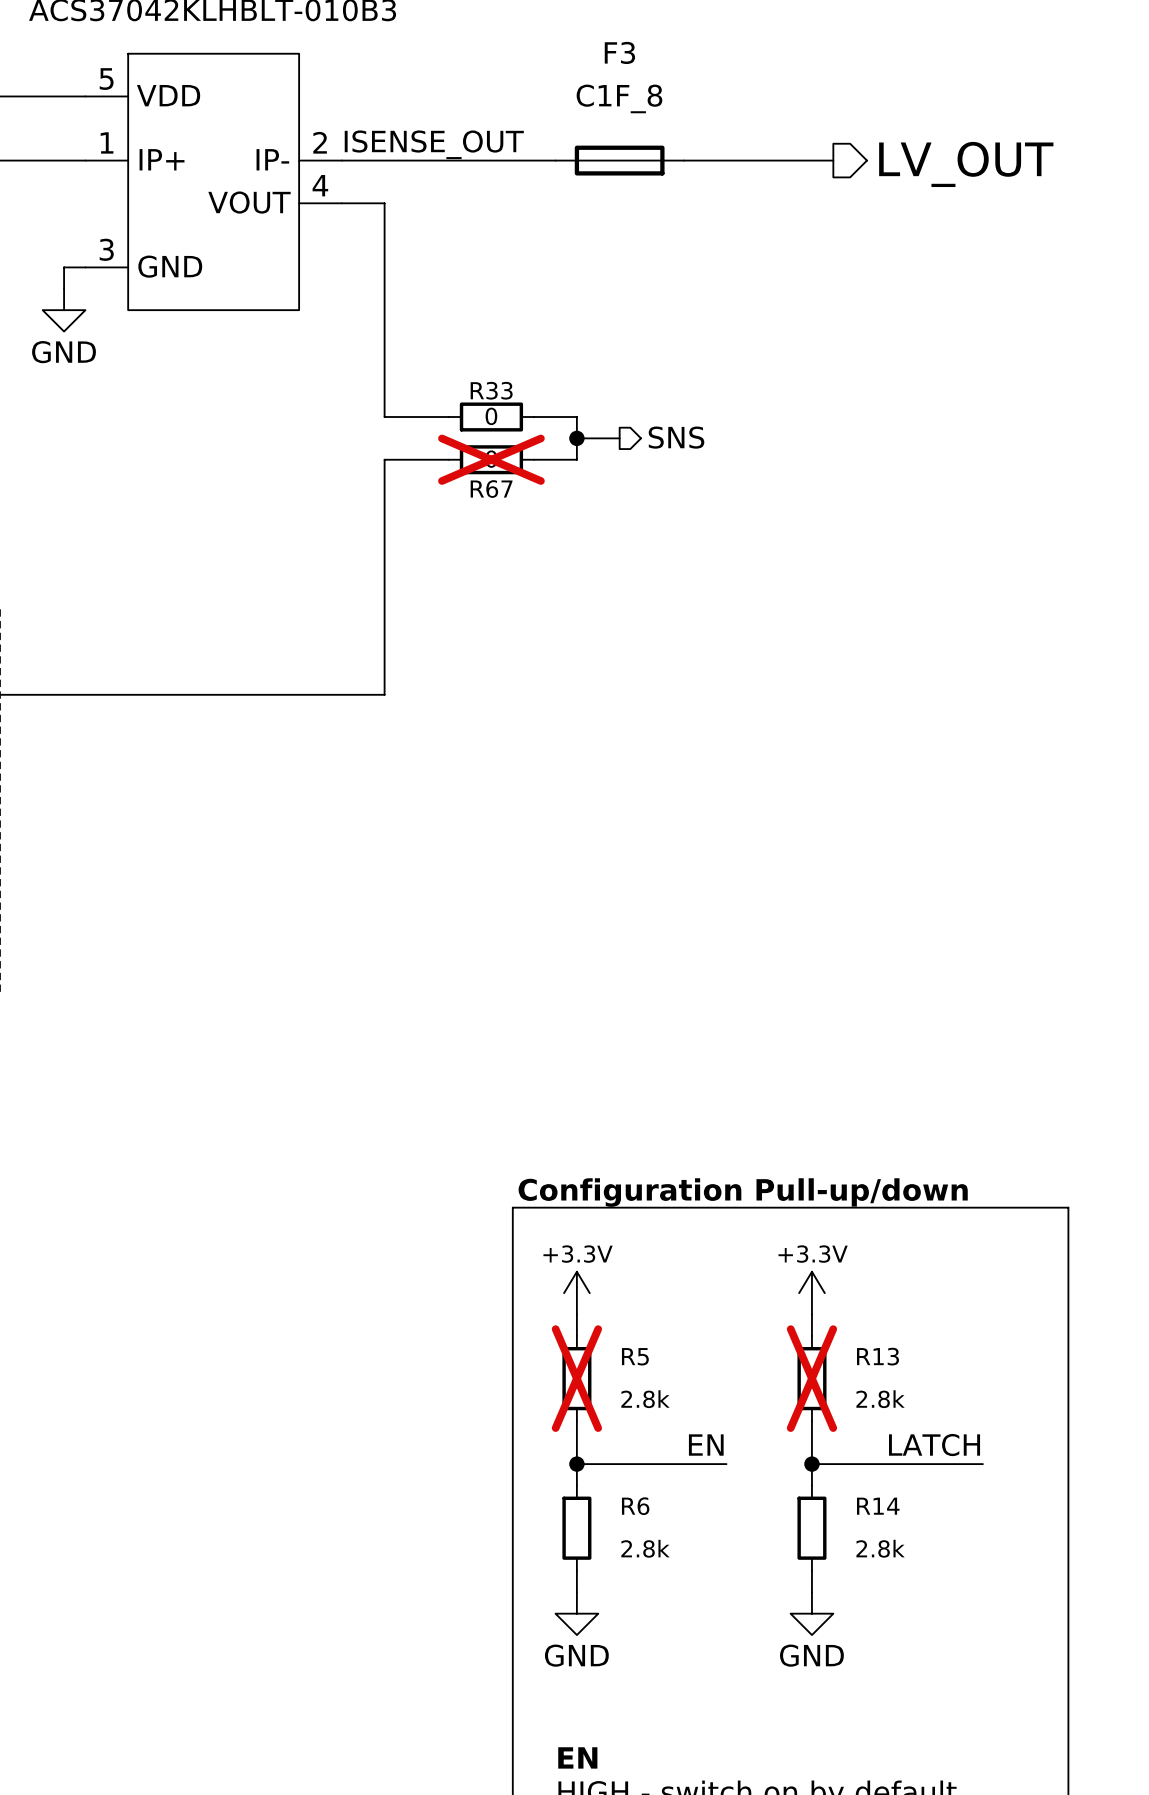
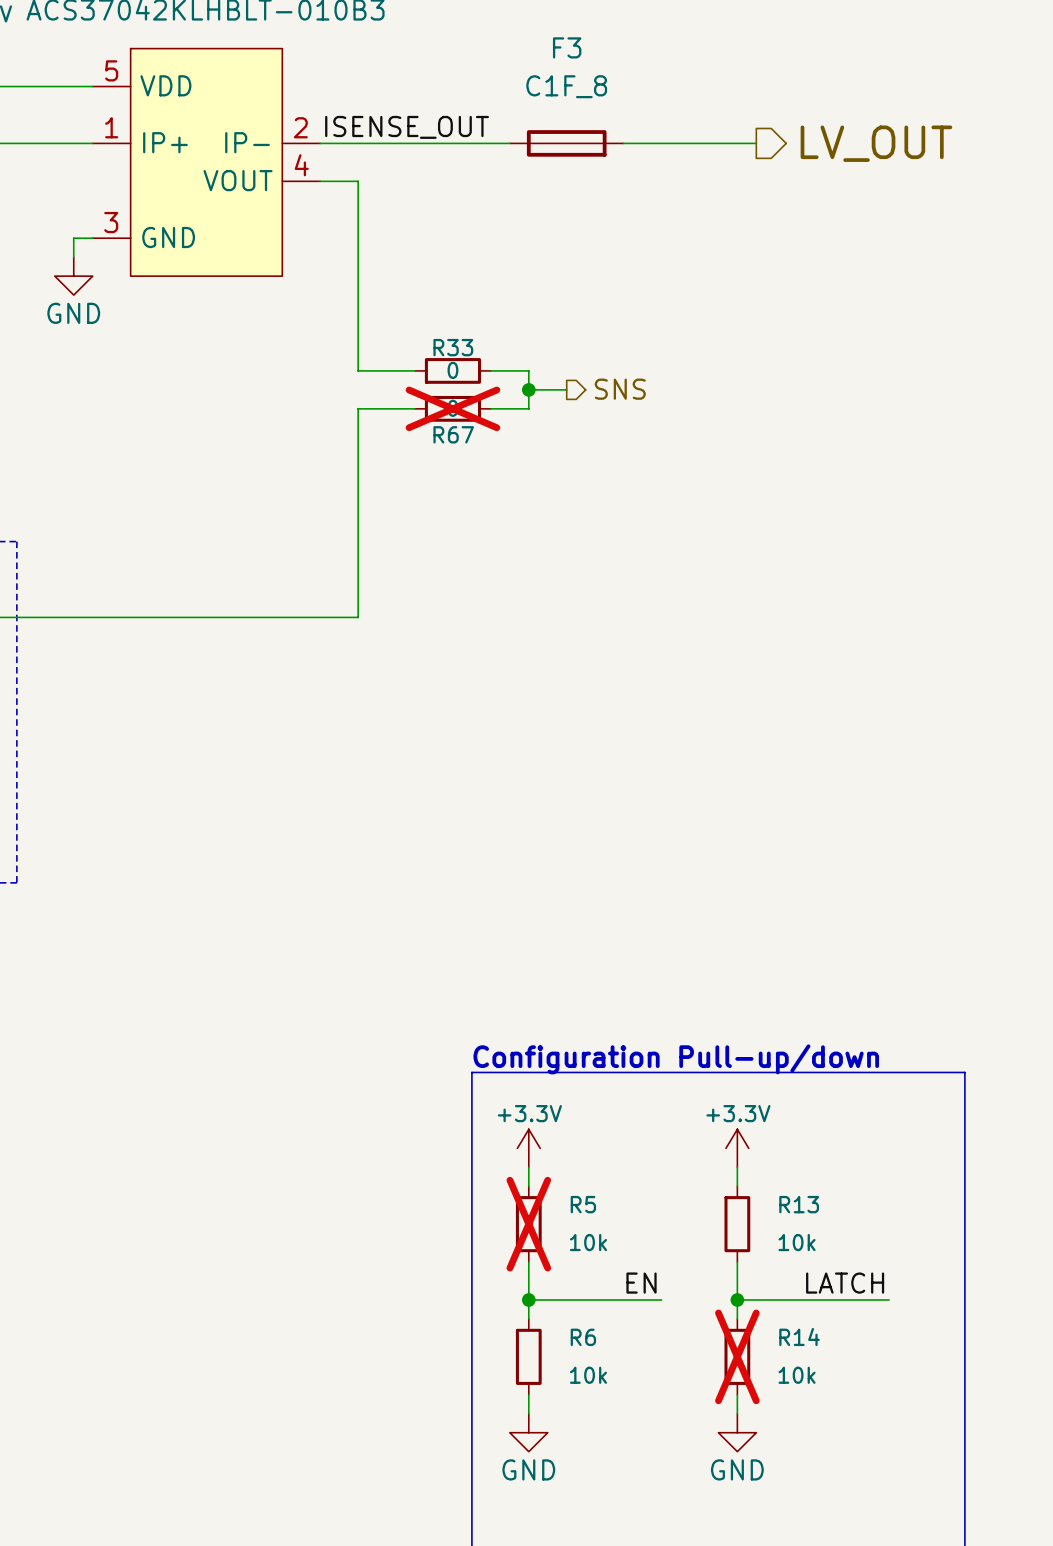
R13 do-not-place cross: (811, 1378) -> none
R5 value: 2.8k (645, 1399) -> 10k (588, 1242)
R13 value: 2.8k (880, 1399) -> 10k (797, 1242)
R14 do-not-place cross: none -> (737, 1356)
R6 value: 2.8k (645, 1548) -> 10k (588, 1375)
R14 value: 2.8k (880, 1548) -> 10k (797, 1375)

